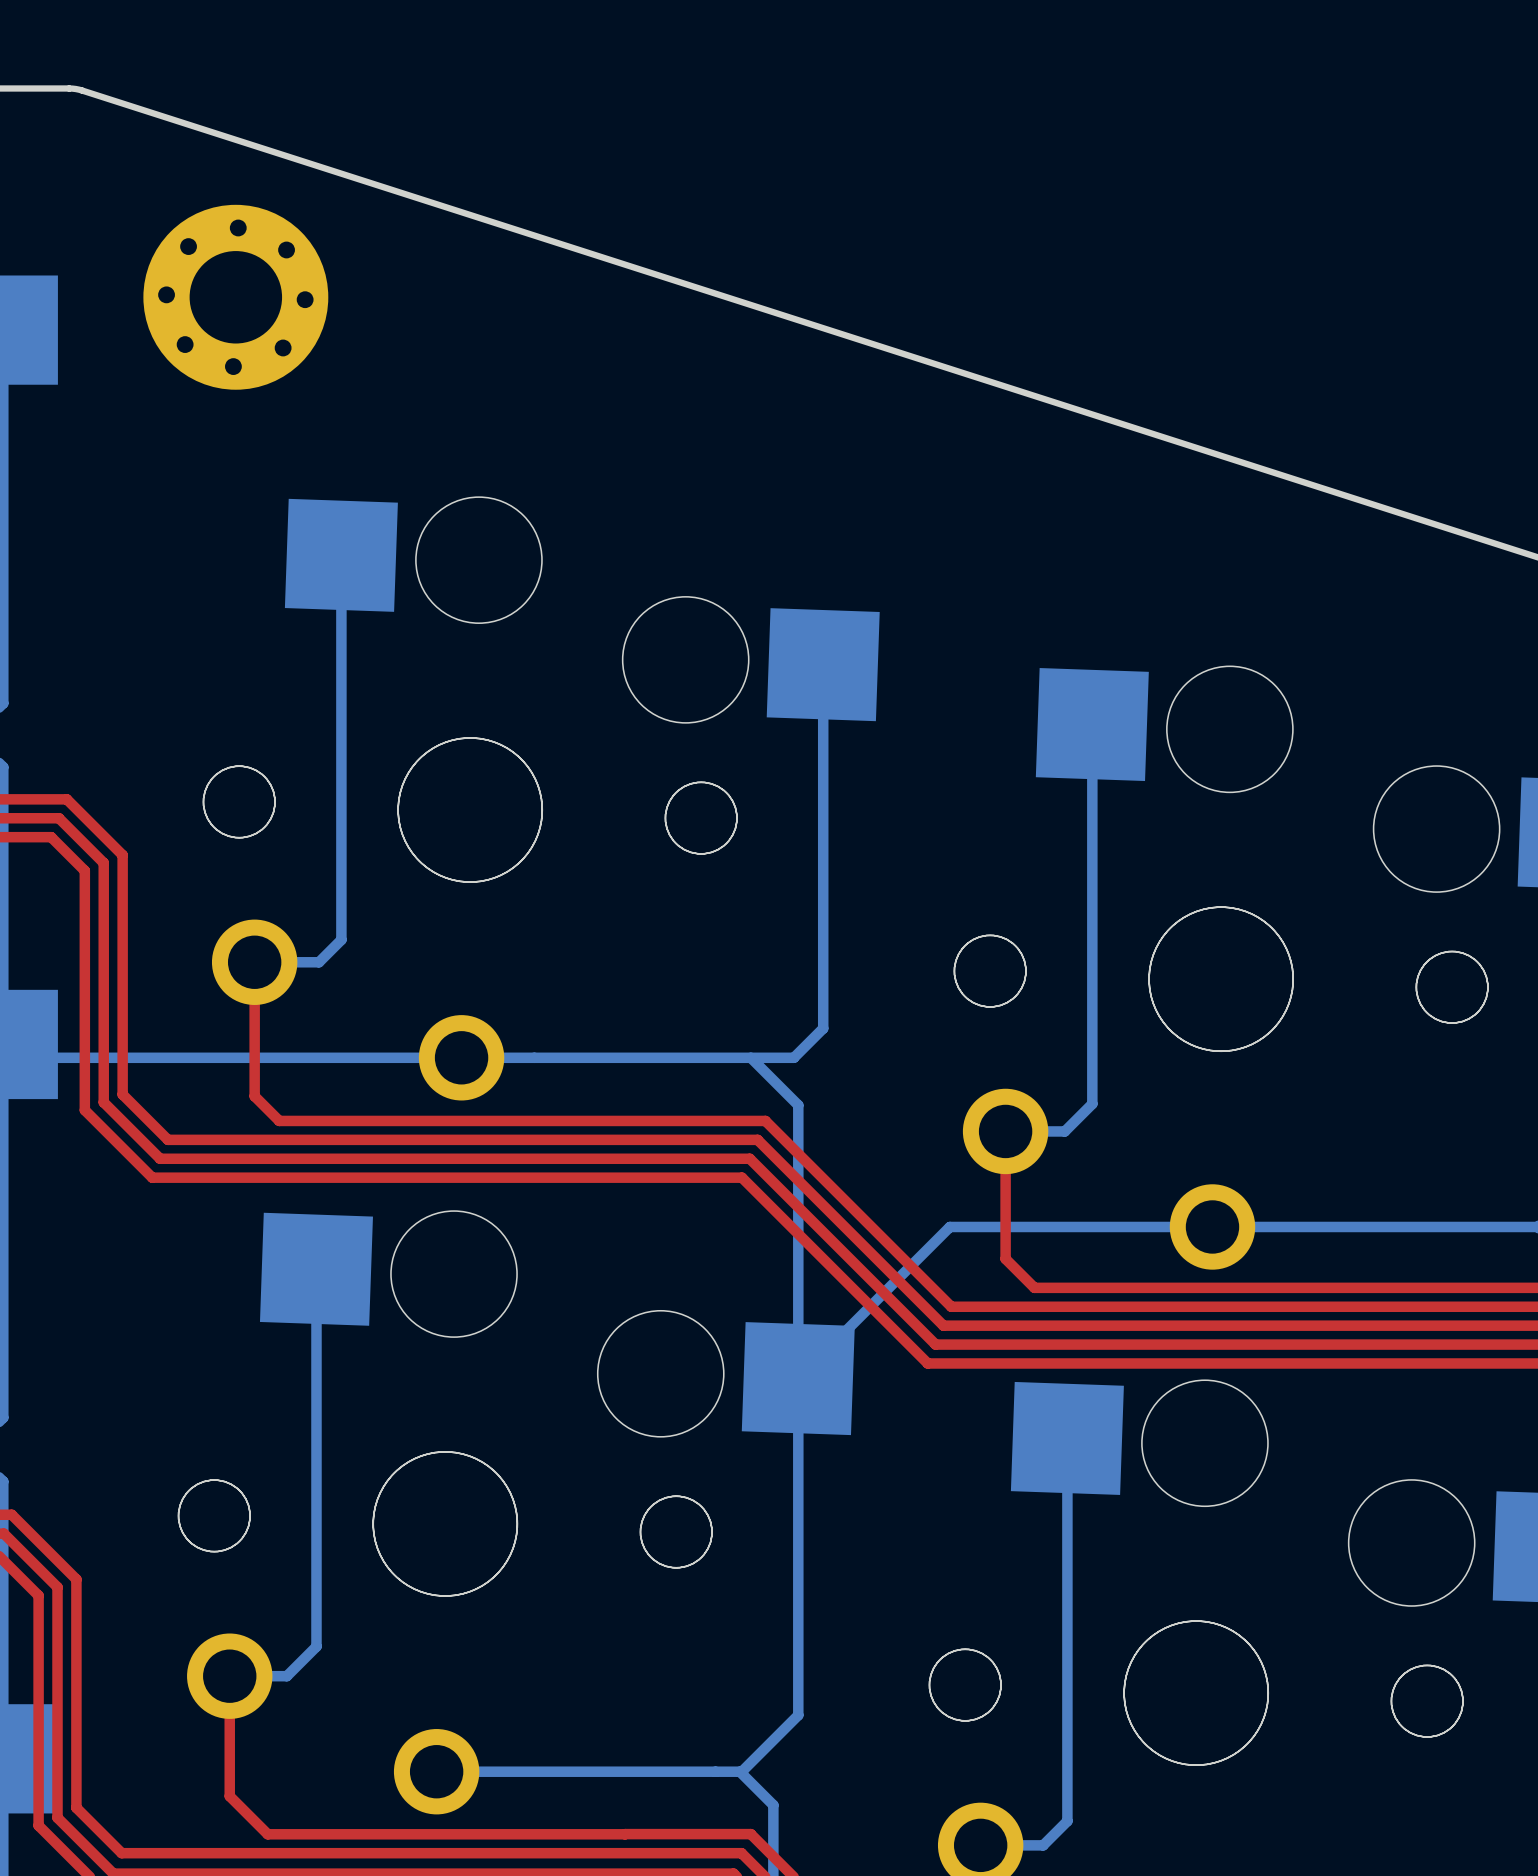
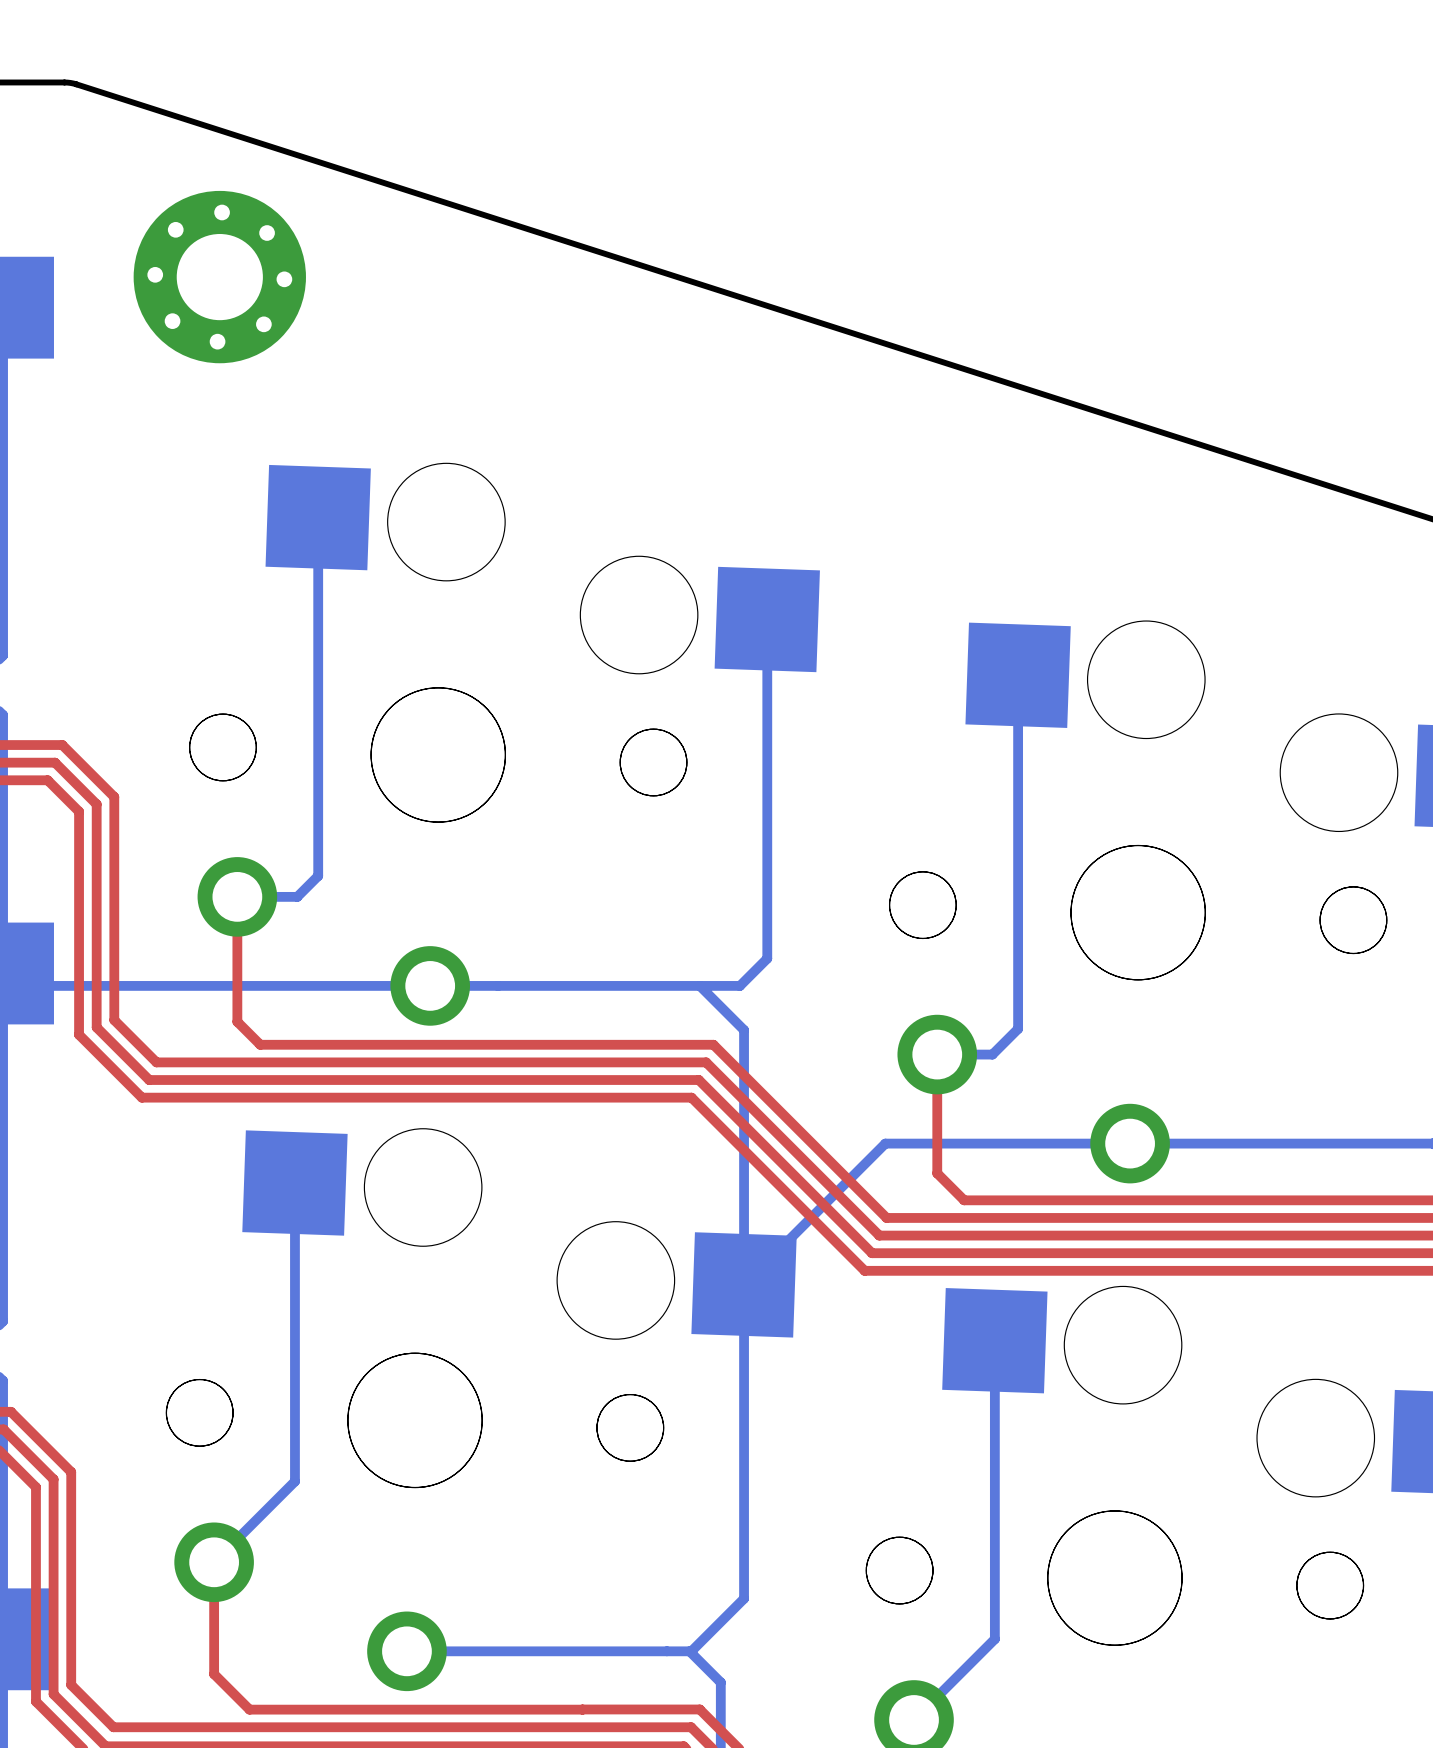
bottom track: (316, 1589) (316, 1646) (286, 1676) (229, 1676) -> (294, 1481) (214, 1562)
bottom track: (1067, 1758) (1067, 1821) (1043, 1845) (980, 1845) -> (994, 1639) (914, 1719)

